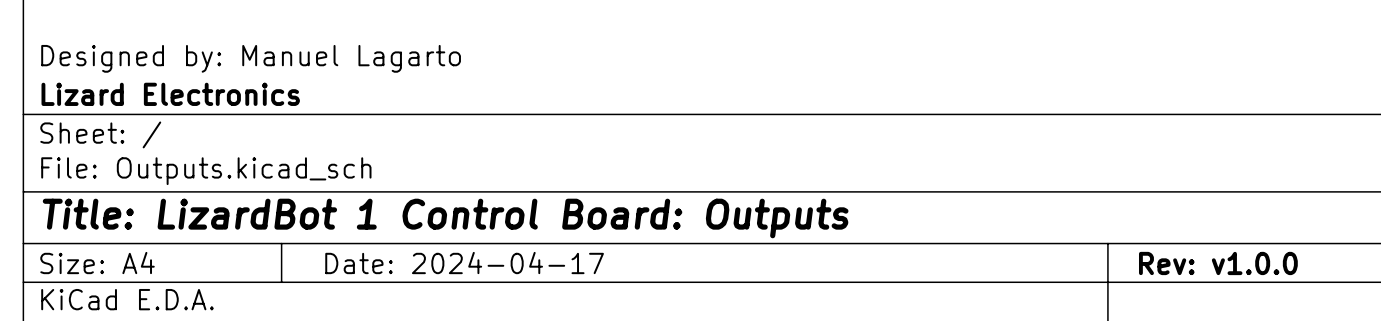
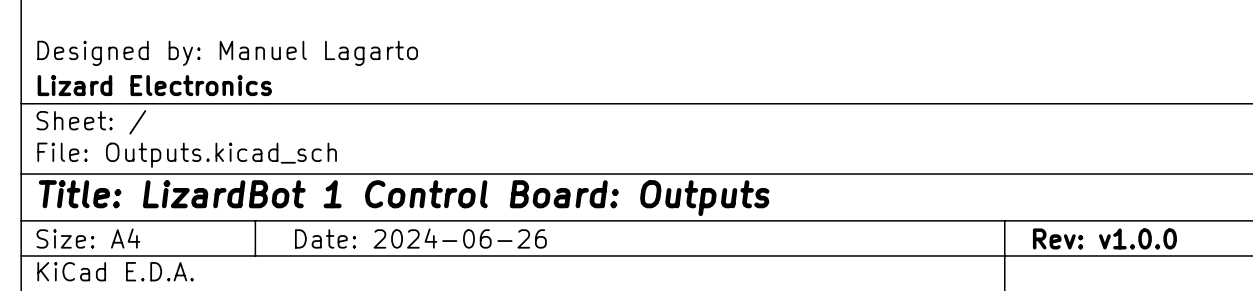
title block: Date: 2024-04-17 (464, 263) -> Date: 2024-06-26 (420, 238)

